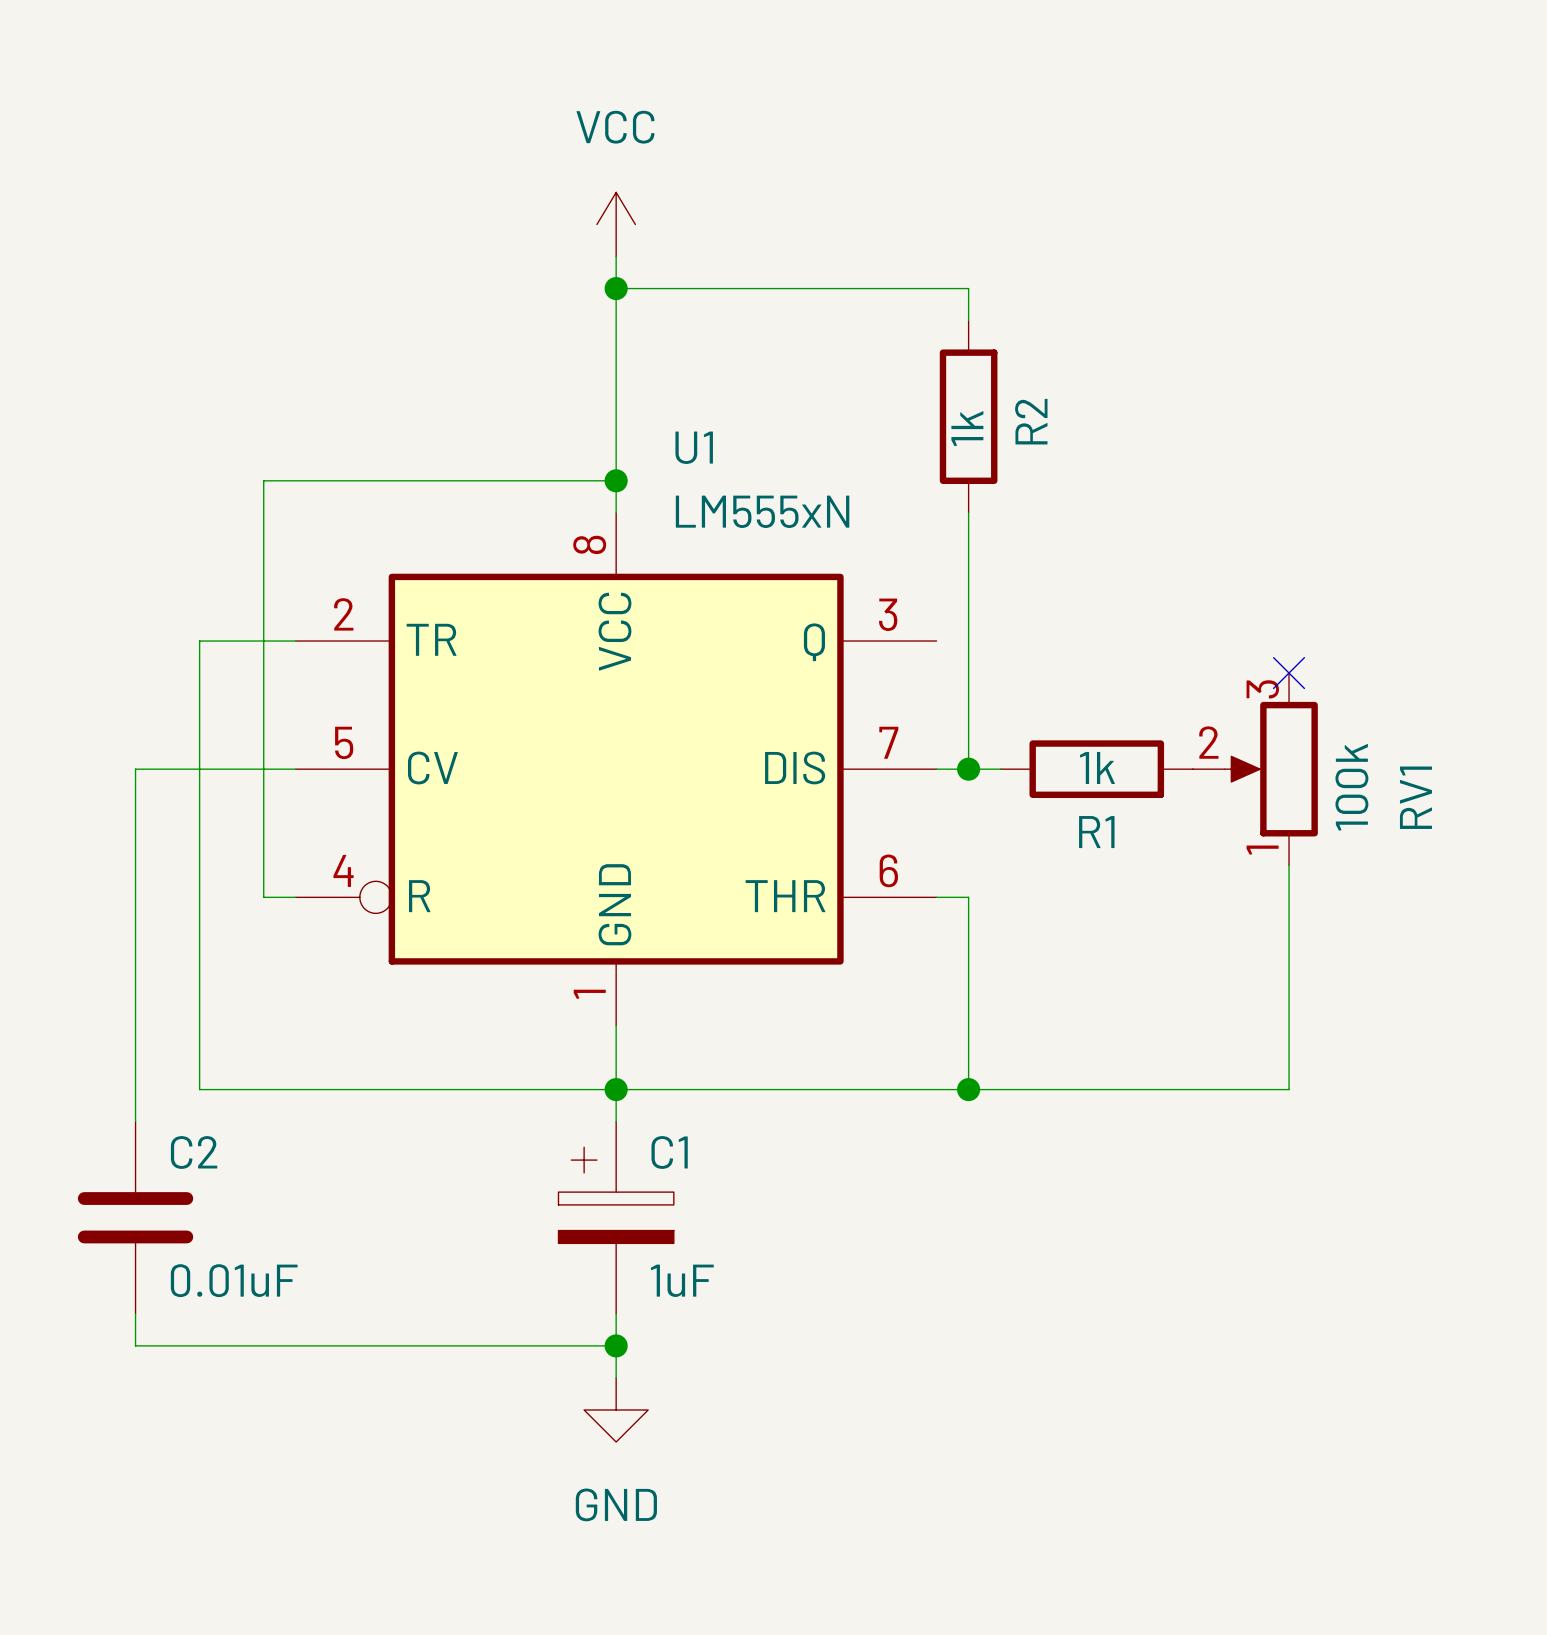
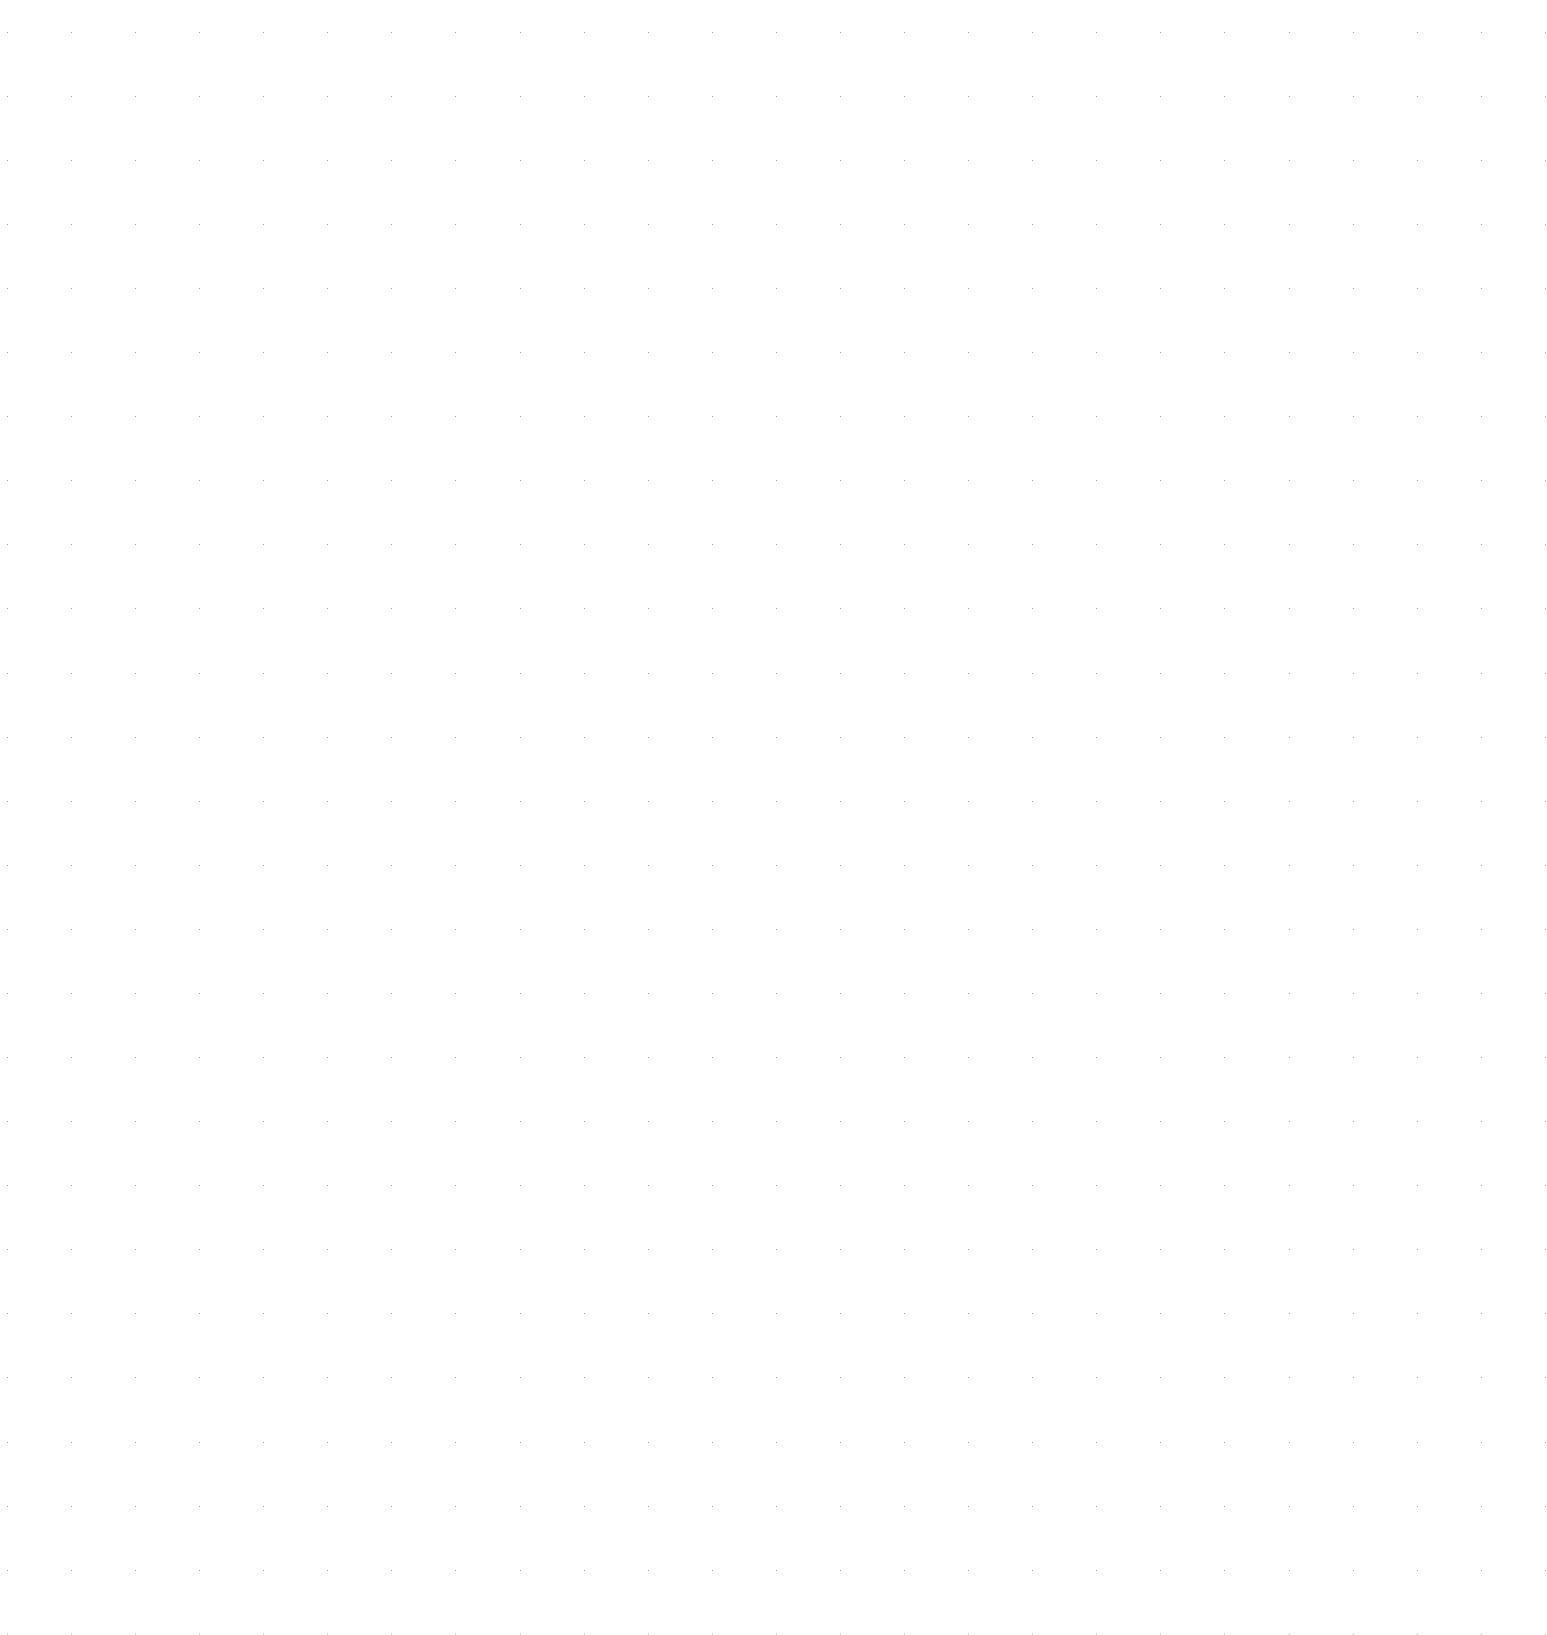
power symbol: VCC (616, 224) -> none
wire: (616, 256) (616, 512) -> none
wire: (616, 288) (968, 288) (968, 320) -> none
junction: (616, 288) -> none
R2: 1k (968, 416) -> none
wire: (616, 480) (263, 480) (263, 897) (295, 897) -> none
junction: (616, 480) -> none
wire: (968, 512) (968, 769) -> none
wire: (295, 641) (199, 641) (199, 1089) (1289, 1089) (1289, 865) -> none
no-connect mark: (1289, 673) -> none
wire: (295, 769) (135, 769) (135, 1121) -> none
U1: LM555xN (616, 769) -> none
wire: (936, 769) (1000, 769) -> none
junction: (968, 769) -> none
R1: 1k (1096, 769) -> none
RV1: 100k (1255, 769) -> none
wire: (936, 897) (968, 897) (968, 1089) -> none
wire: (616, 1025) (616, 1121) -> none
junction: (616, 1089) -> none
junction: (968, 1089) -> none
C2: 0.01uF (135, 1217) -> none
C1: 1uF (616, 1217) -> none
wire: (135, 1313) (135, 1345) (616, 1345) -> none
wire: (616, 1313) (616, 1377) -> none
junction: (616, 1345) -> none
power symbol: GND (616, 1409) -> none

